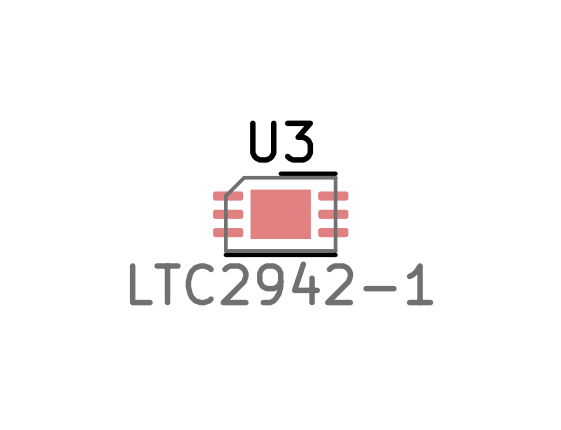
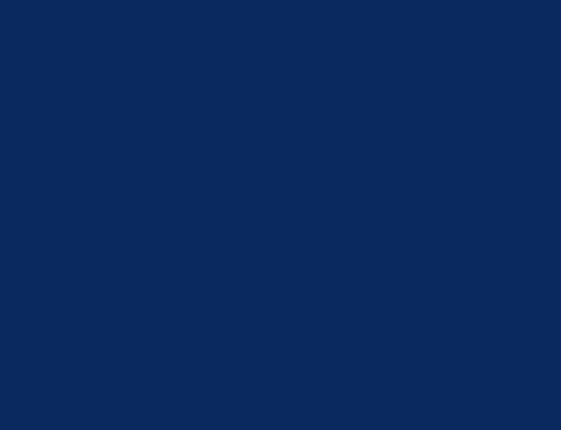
U3: LTC2942-1 (280, 214) -> none

